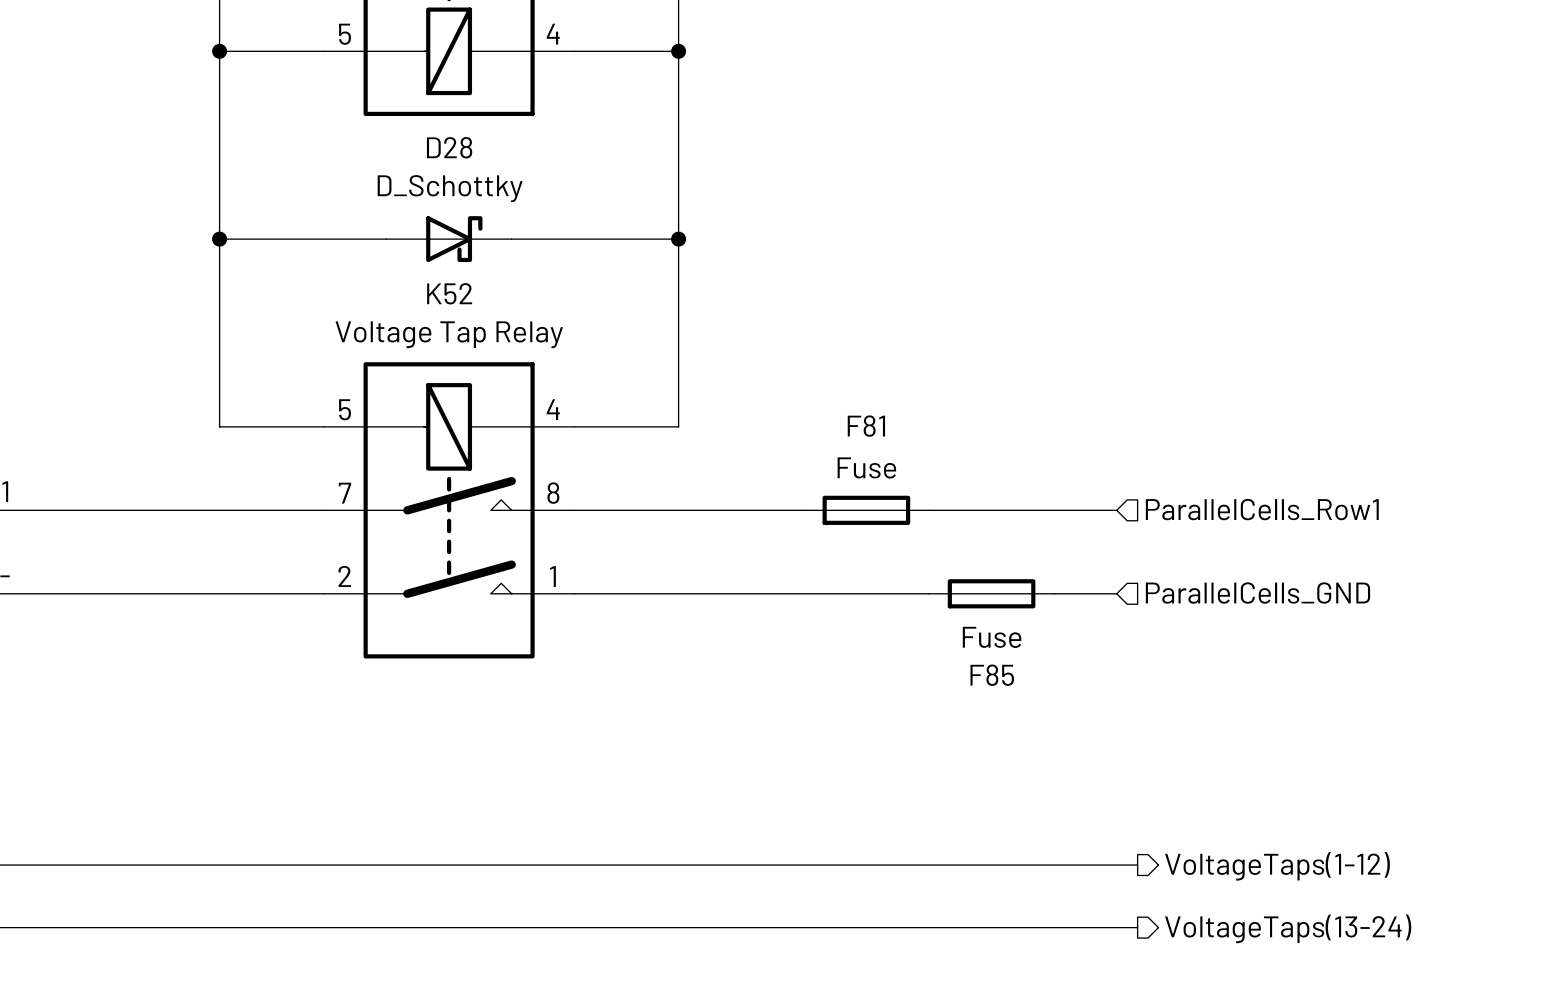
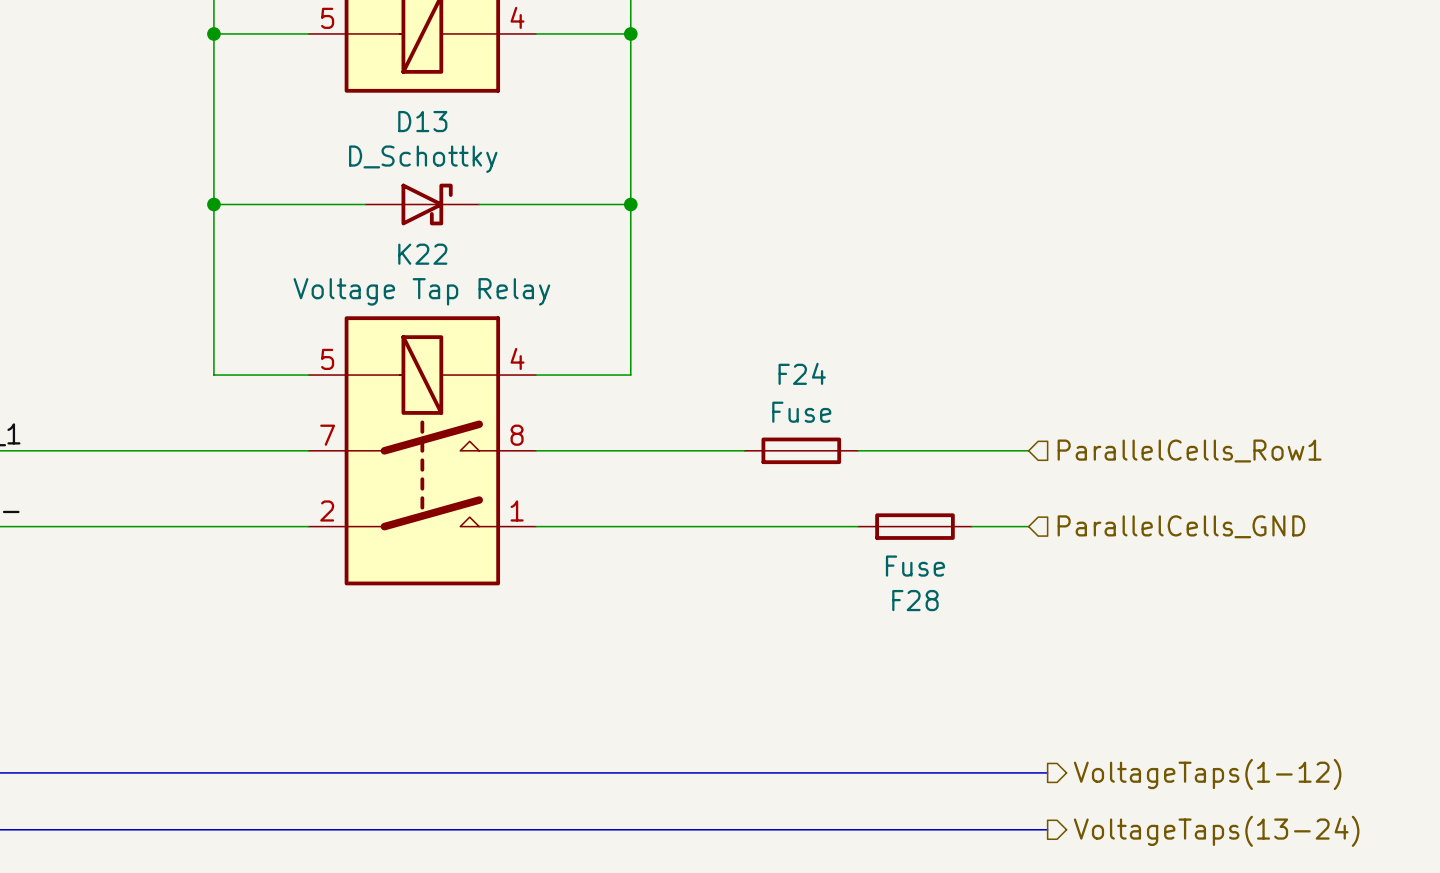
D28 name: D28 (449, 147) -> D13 (422, 121)
K52 name: K52 (449, 293) -> K22 (422, 254)
F81 name: F81 (866, 426) -> F24 (802, 373)
F85 name: F85 (992, 675) -> F28 (915, 600)

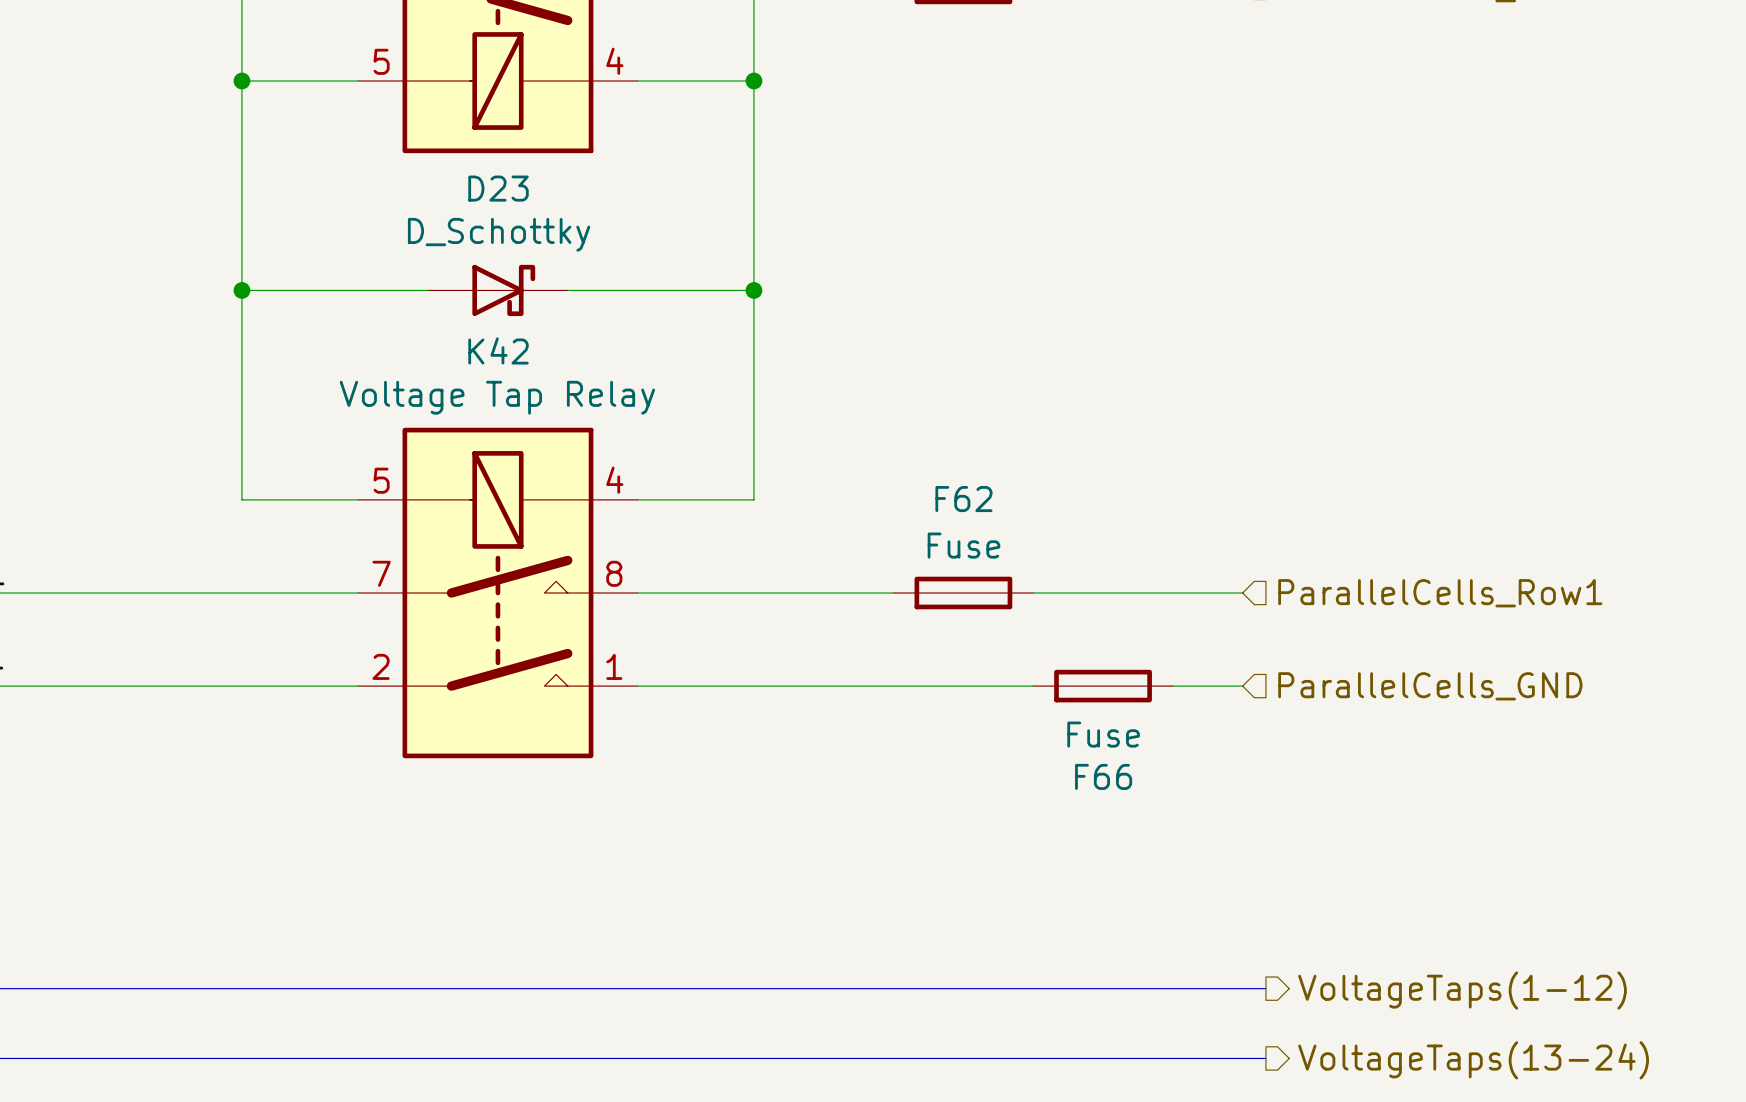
D13 name: D13 (422, 121) -> D23 (498, 188)
K22 name: K22 (422, 254) -> K42 (498, 350)
F24 name: F24 (802, 373) -> F62 (963, 499)
F28 name: F28 (915, 600) -> F66 (1103, 776)

